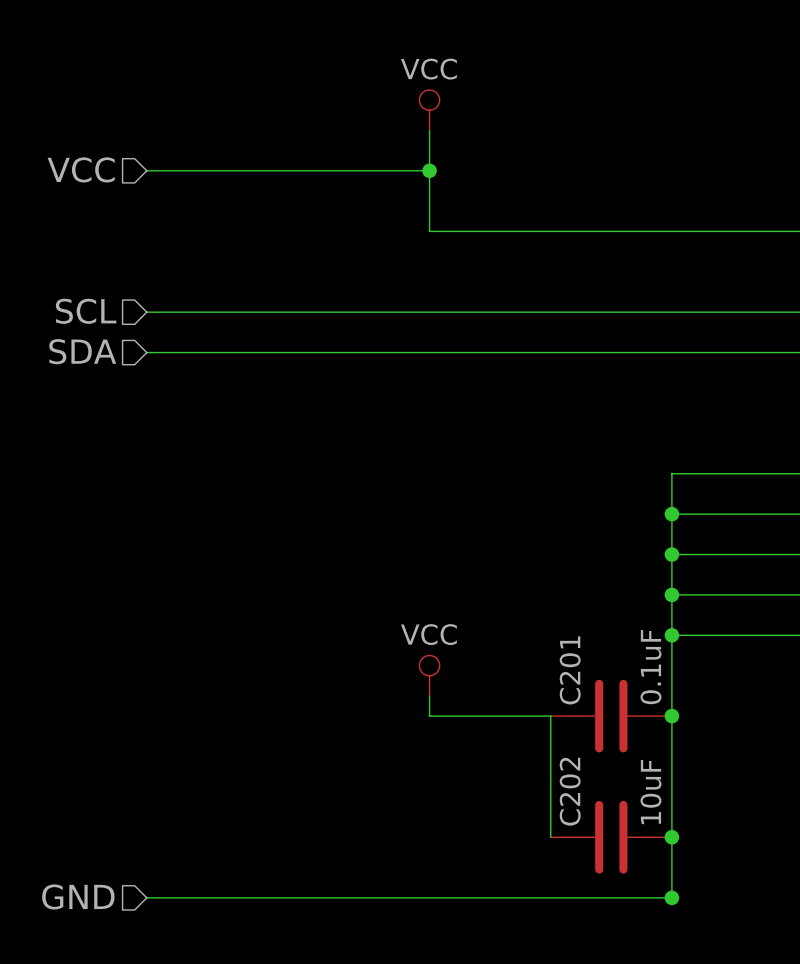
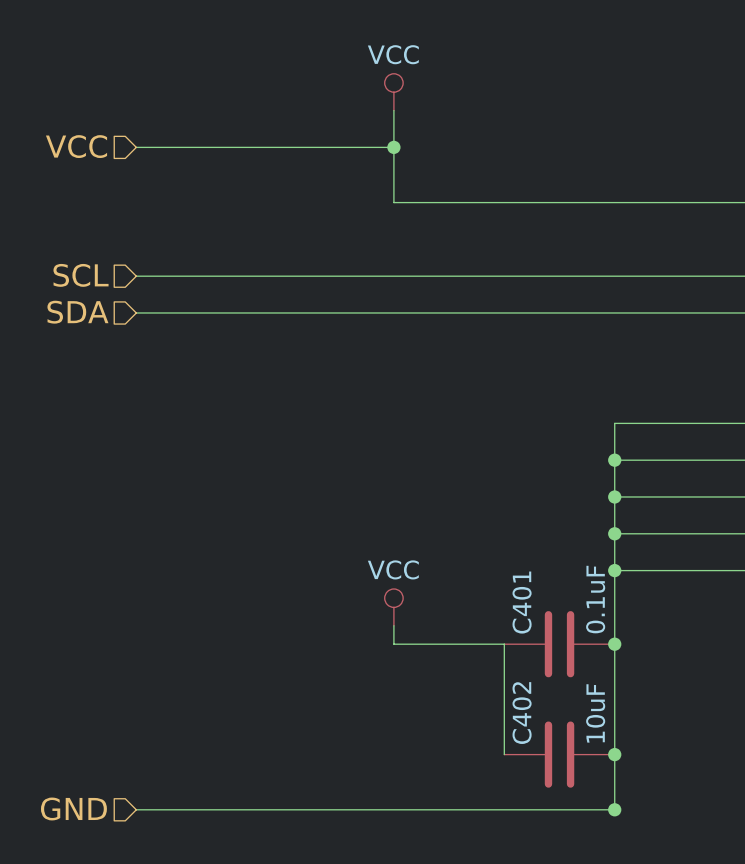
C201 name: C201 (570, 670) -> C401 (522, 602)
C202 name: C202 (570, 791) -> C402 (522, 713)

